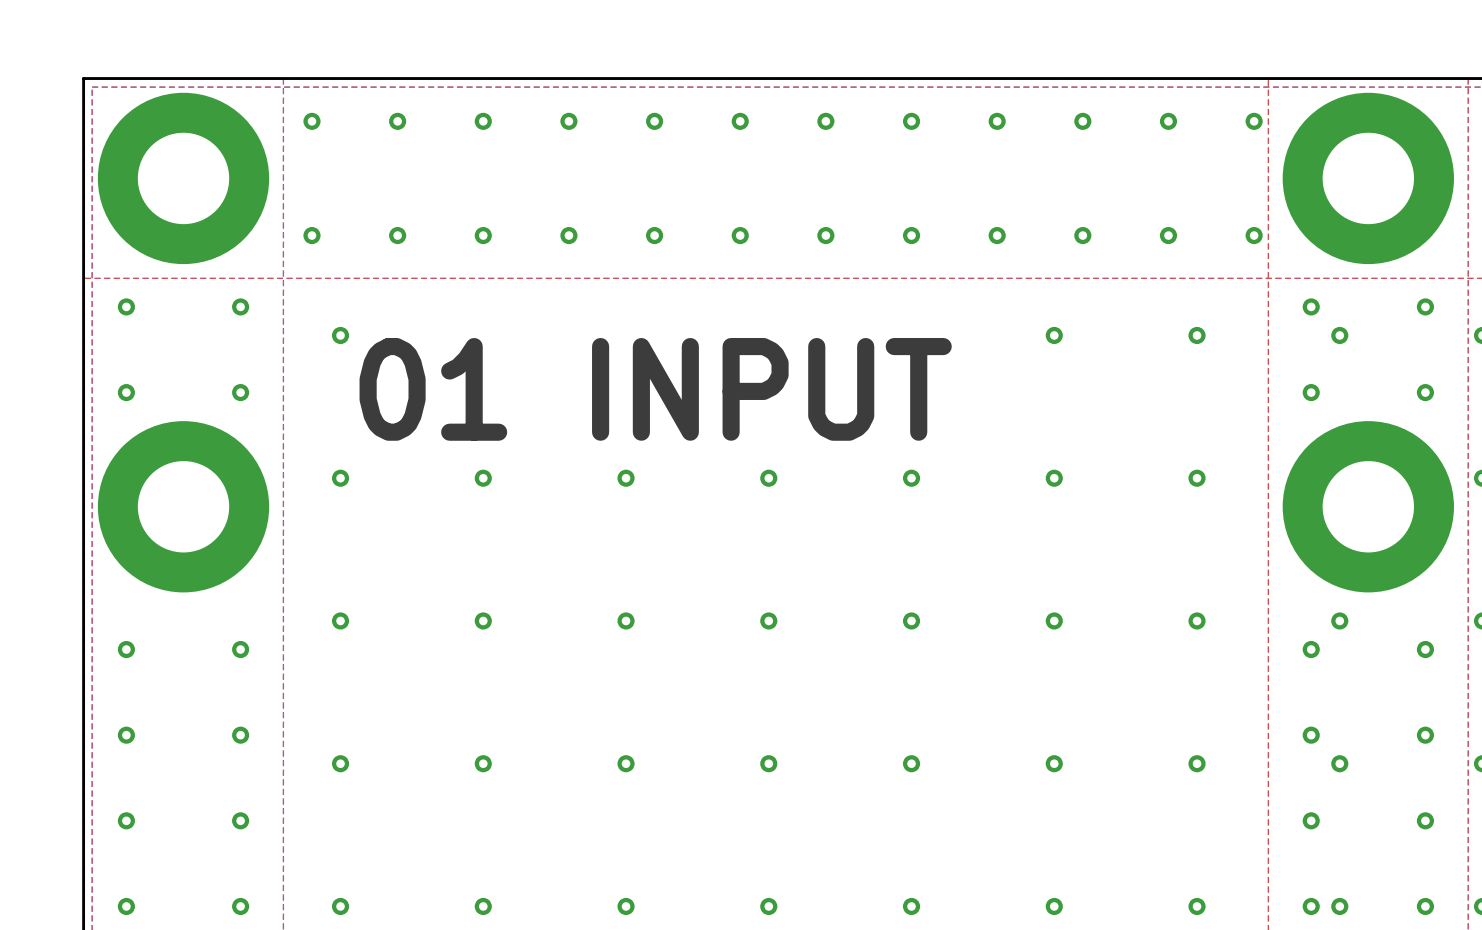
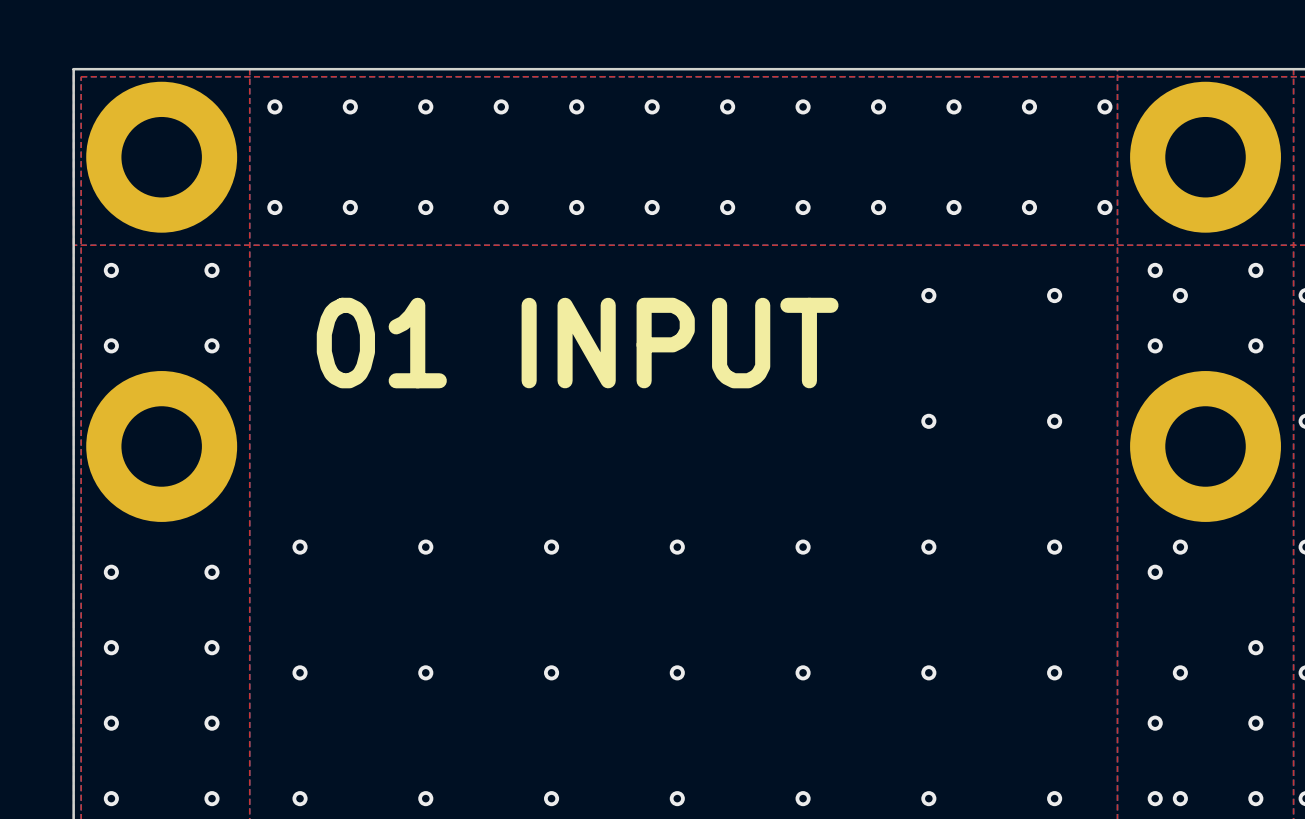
via: (340, 335) -> none
via: (340, 478) -> none
via: (483, 478) -> none
via: (626, 478) -> none
via: (768, 478) -> none
via: (911, 478) -> none
via: (1425, 649) -> none
via: (1311, 735) -> none

